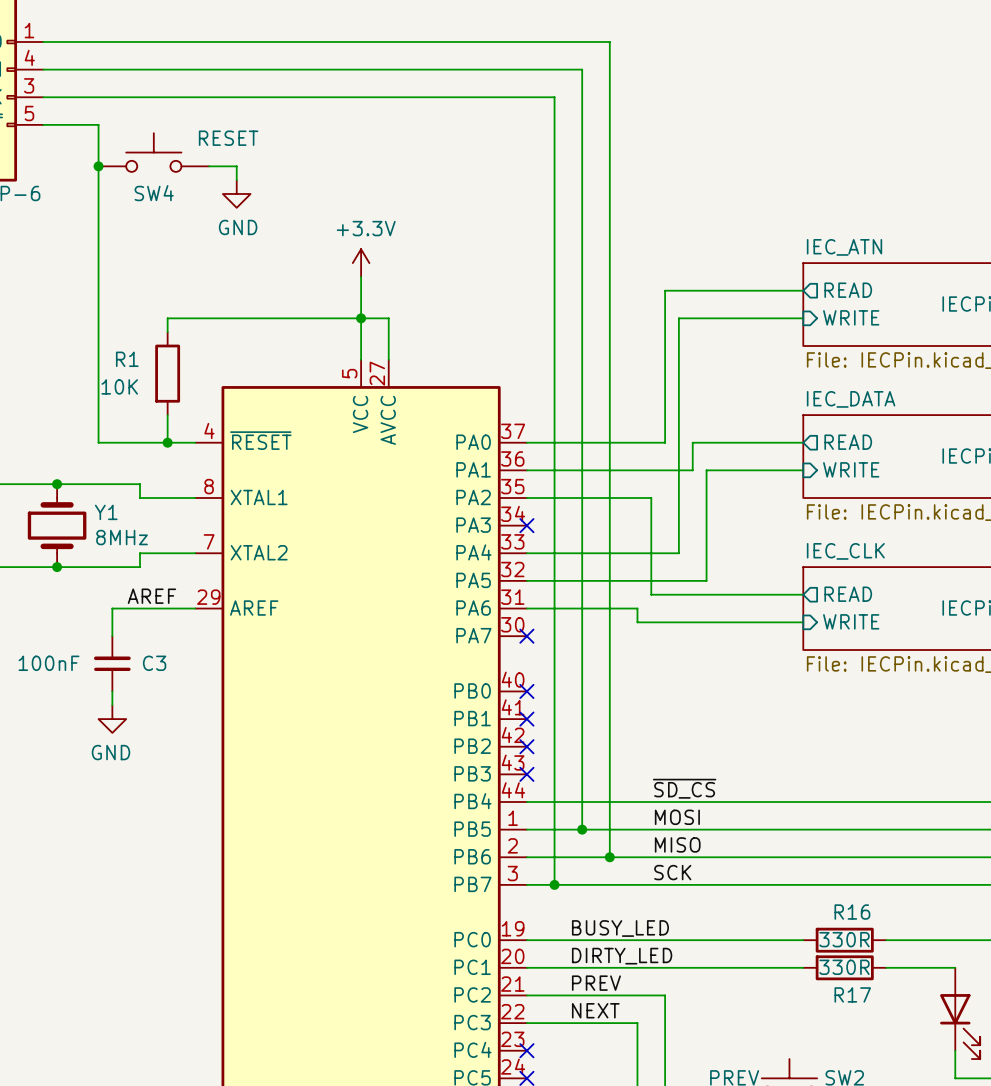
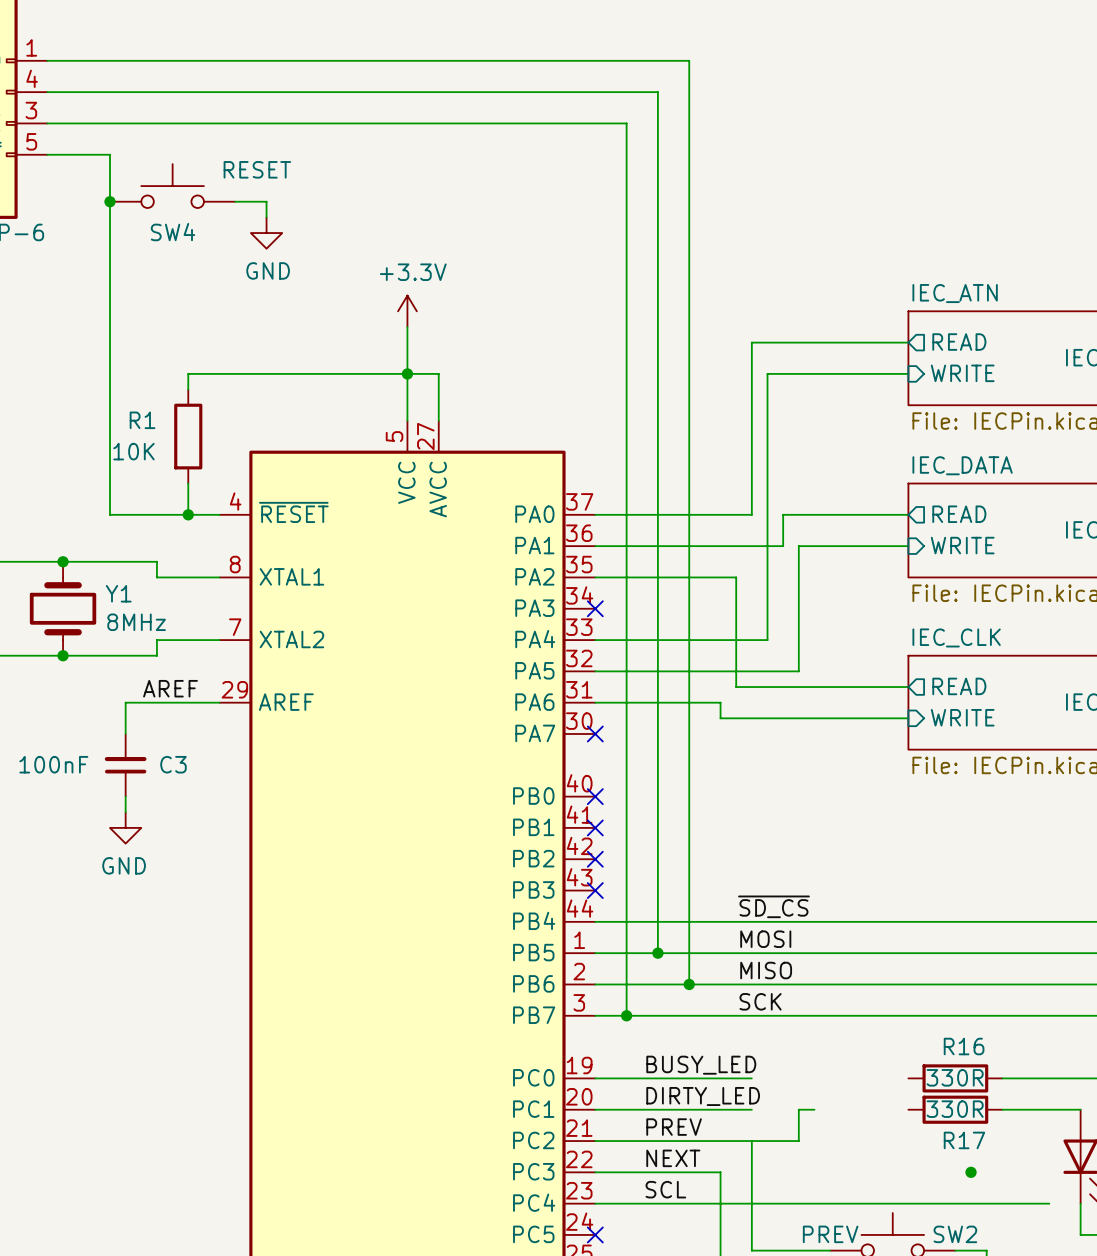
wire: (665, 940) (803, 940) -> none
wire: (665, 967) (706, 967) -> (751, 1141) (798, 1141) (798, 1109)
wire: (720, 967) (803, 967) -> none
junction: none -> (971, 1172)
label: none -> SCL (665, 1189)
wire: none -> (595, 1203) (1049, 1203)
no-connect mark: (526, 1050) -> none

